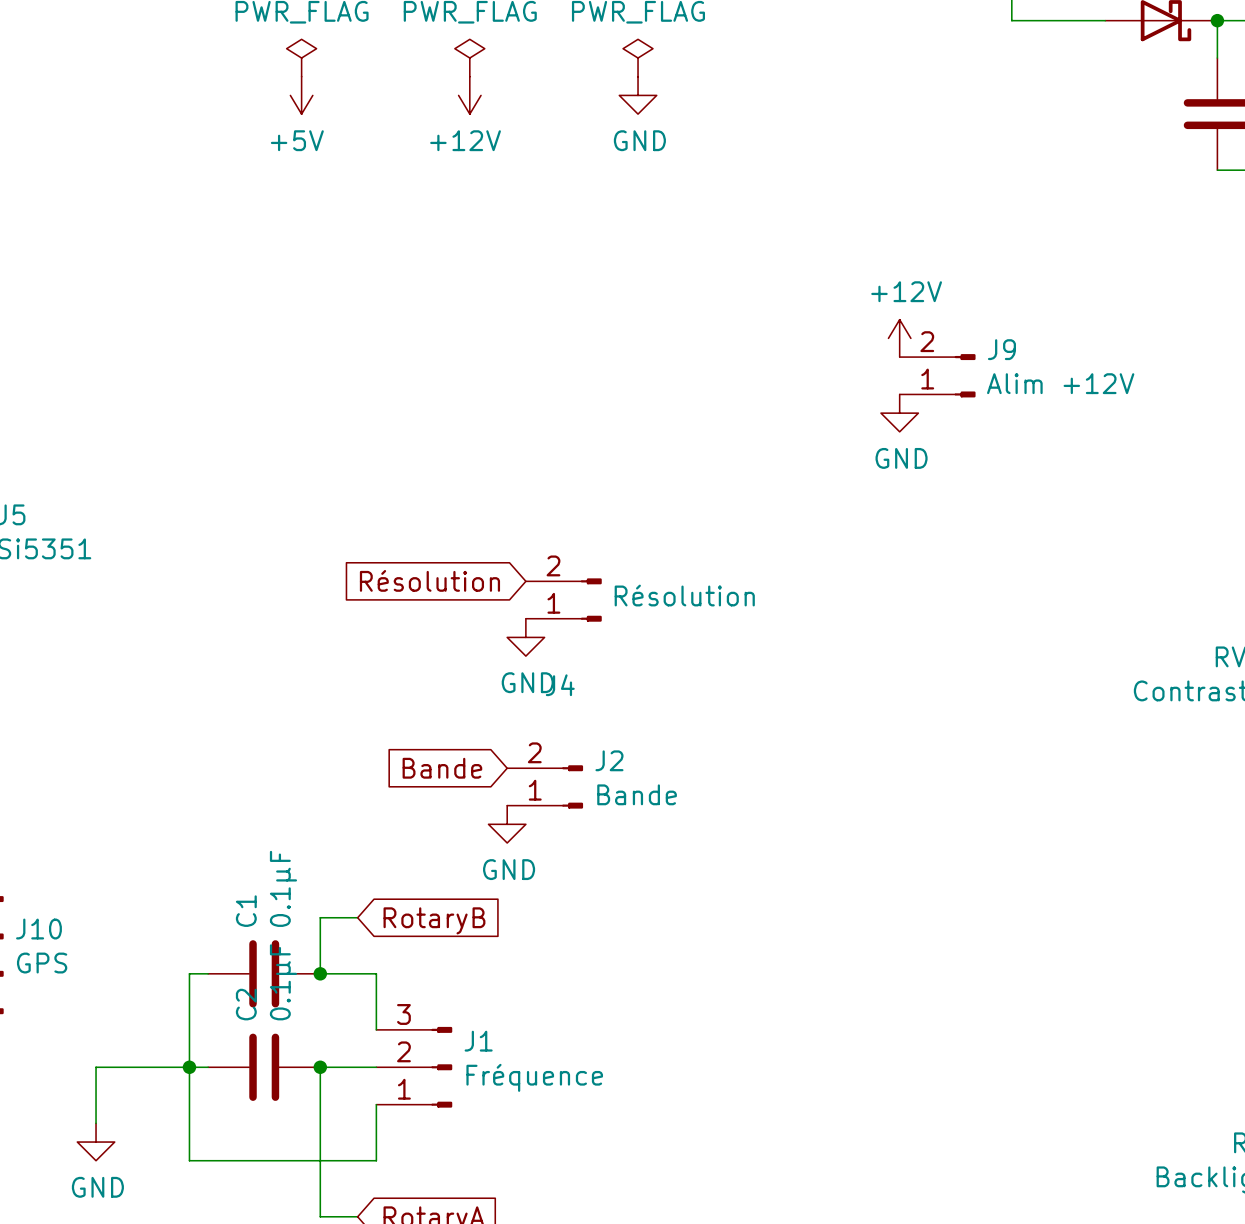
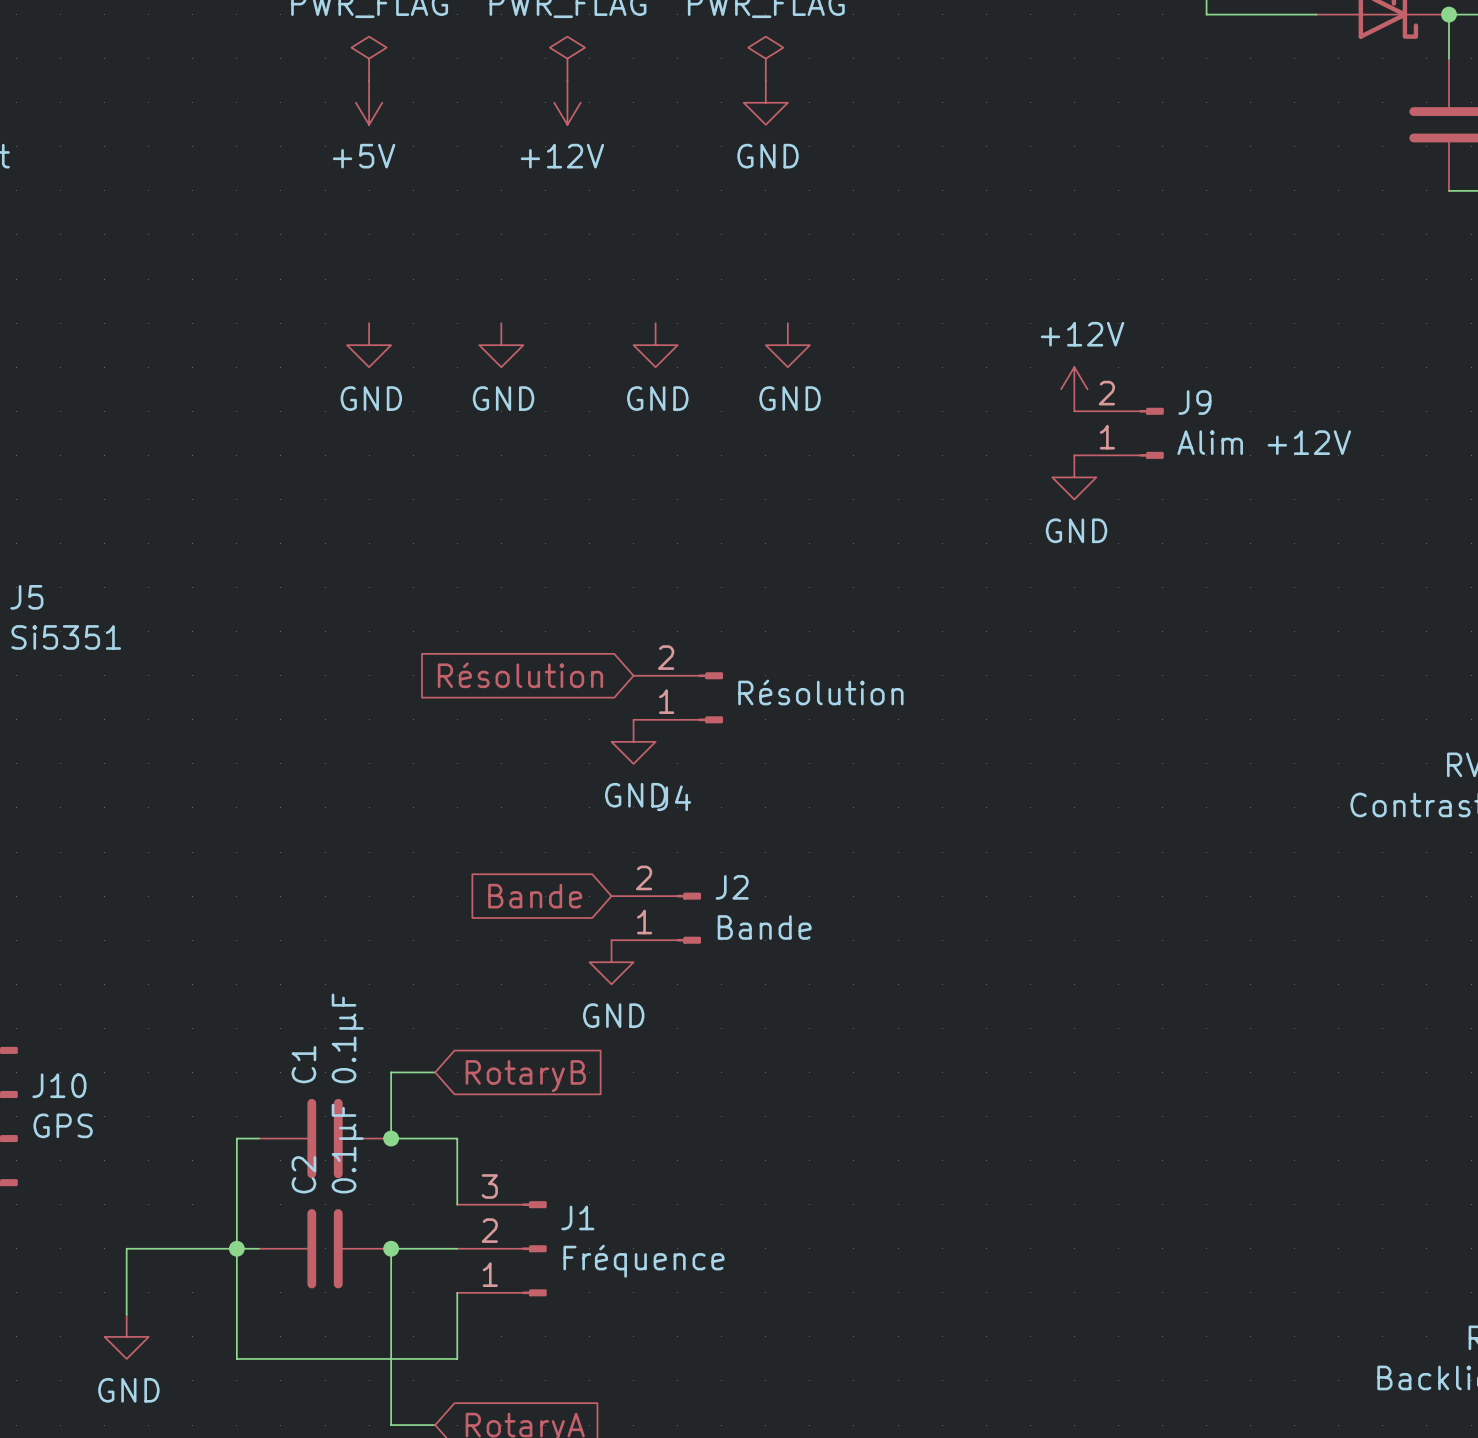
power symbol: none -> GND (369, 345)
power symbol: none -> GND (501, 345)
power symbol: none -> GND (655, 345)
power symbol: none -> GND (787, 345)

